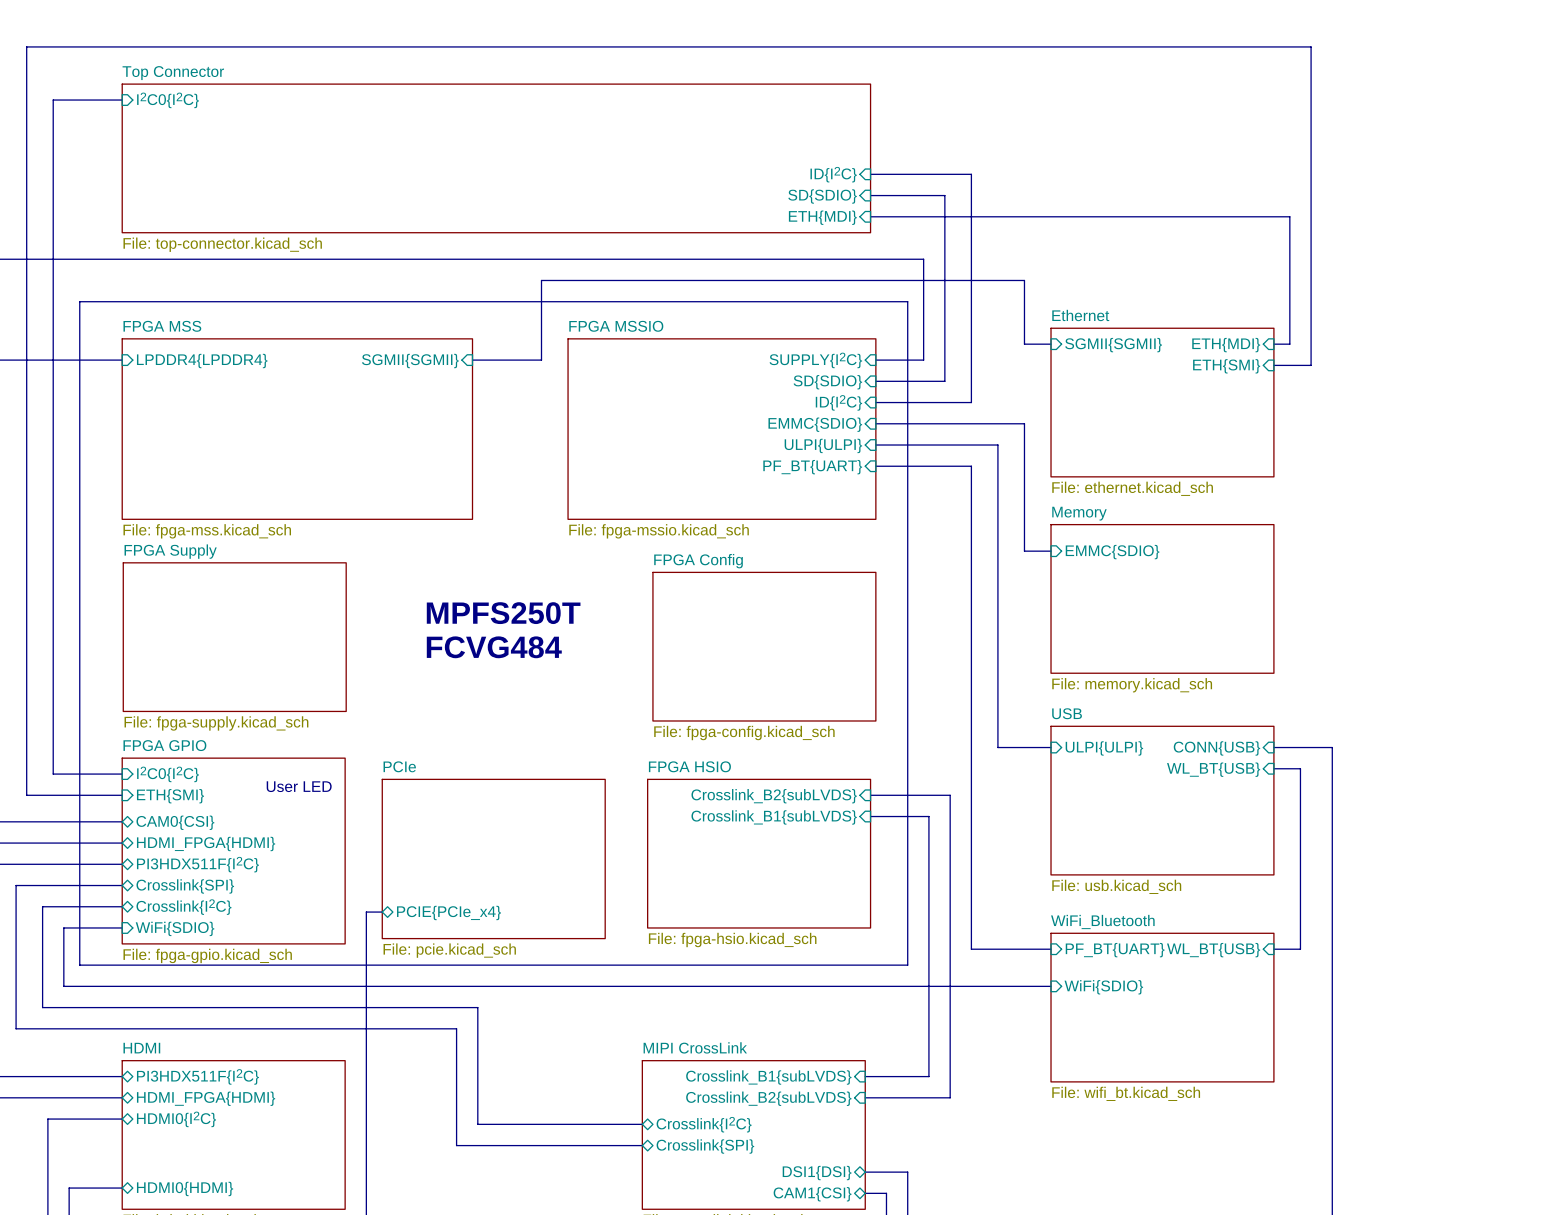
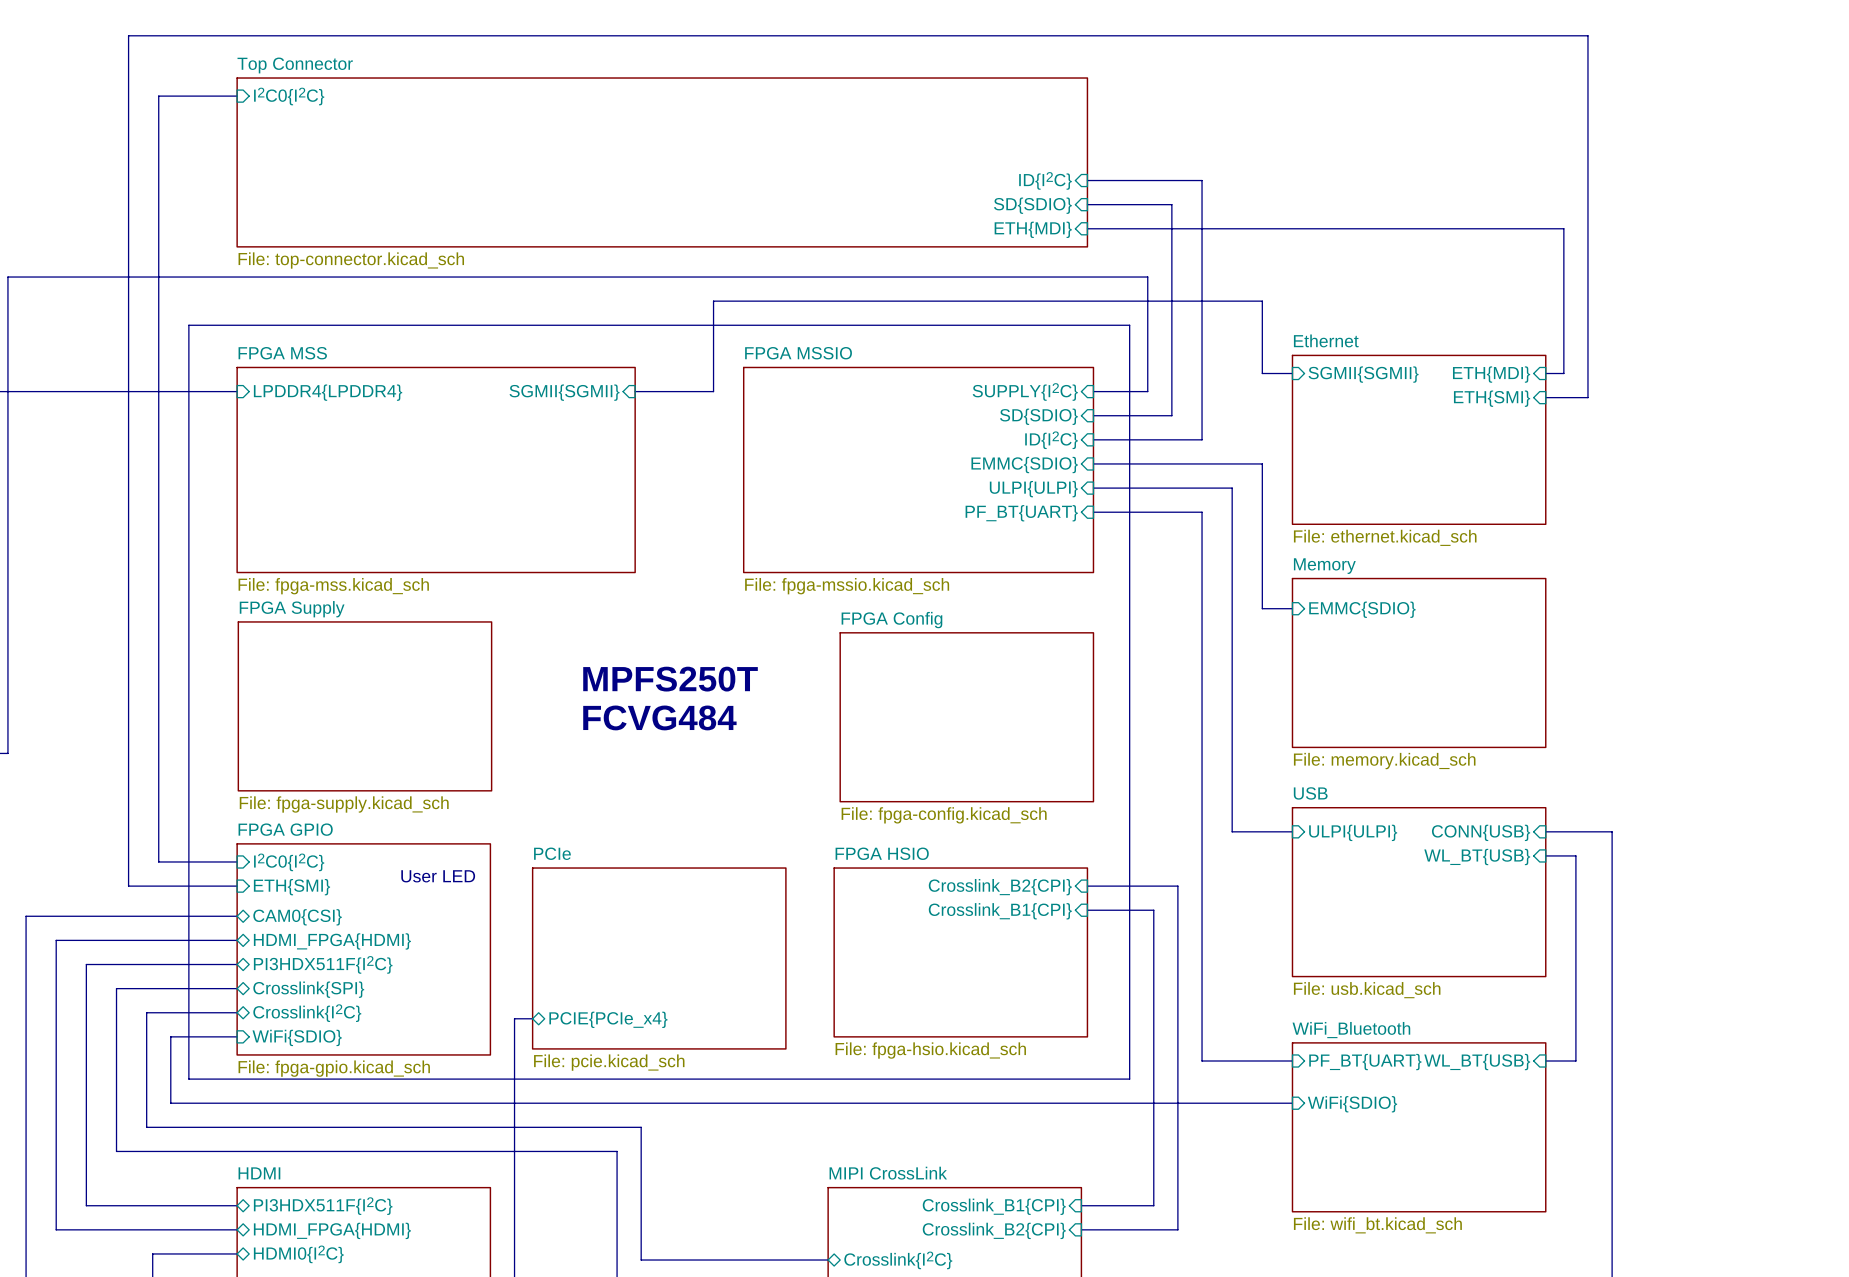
sheet pin: Crosslink_B2{subLVDS} (774, 796) -> Crosslink_B2{CPI} (1000, 887)
sheet pin: Crosslink_B1{subLVDS} (774, 817) -> Crosslink_B1{CPI} (1000, 911)
sheet pin: Crosslink_B1{subLVDS} (768, 1077) -> Crosslink_B1{CPI} (994, 1206)
sheet pin: Crosslink_B2{subLVDS} (768, 1098) -> Crosslink_B2{CPI} (994, 1230)

